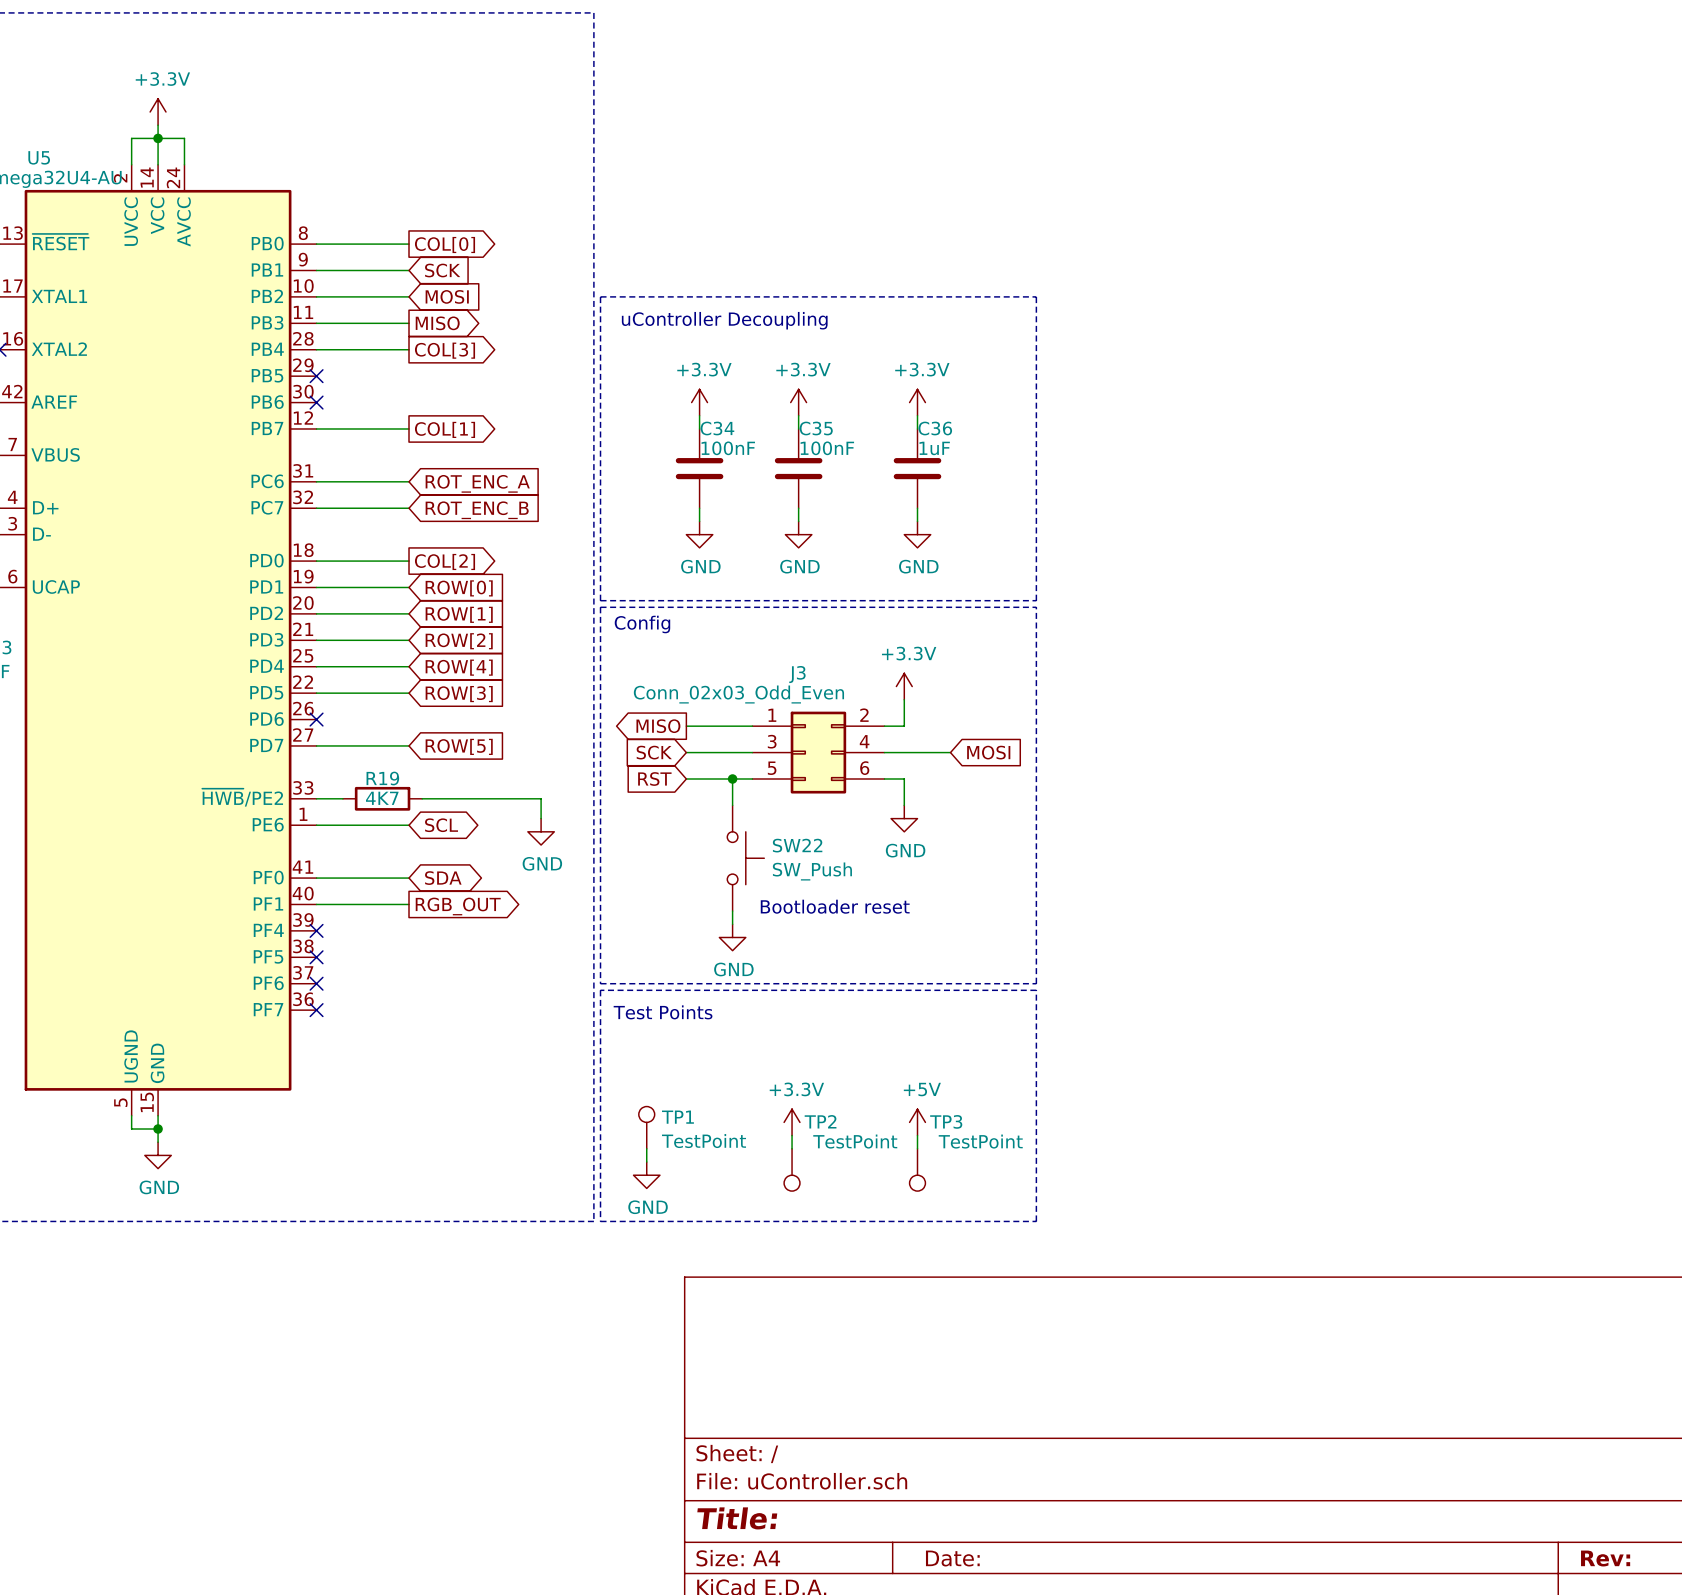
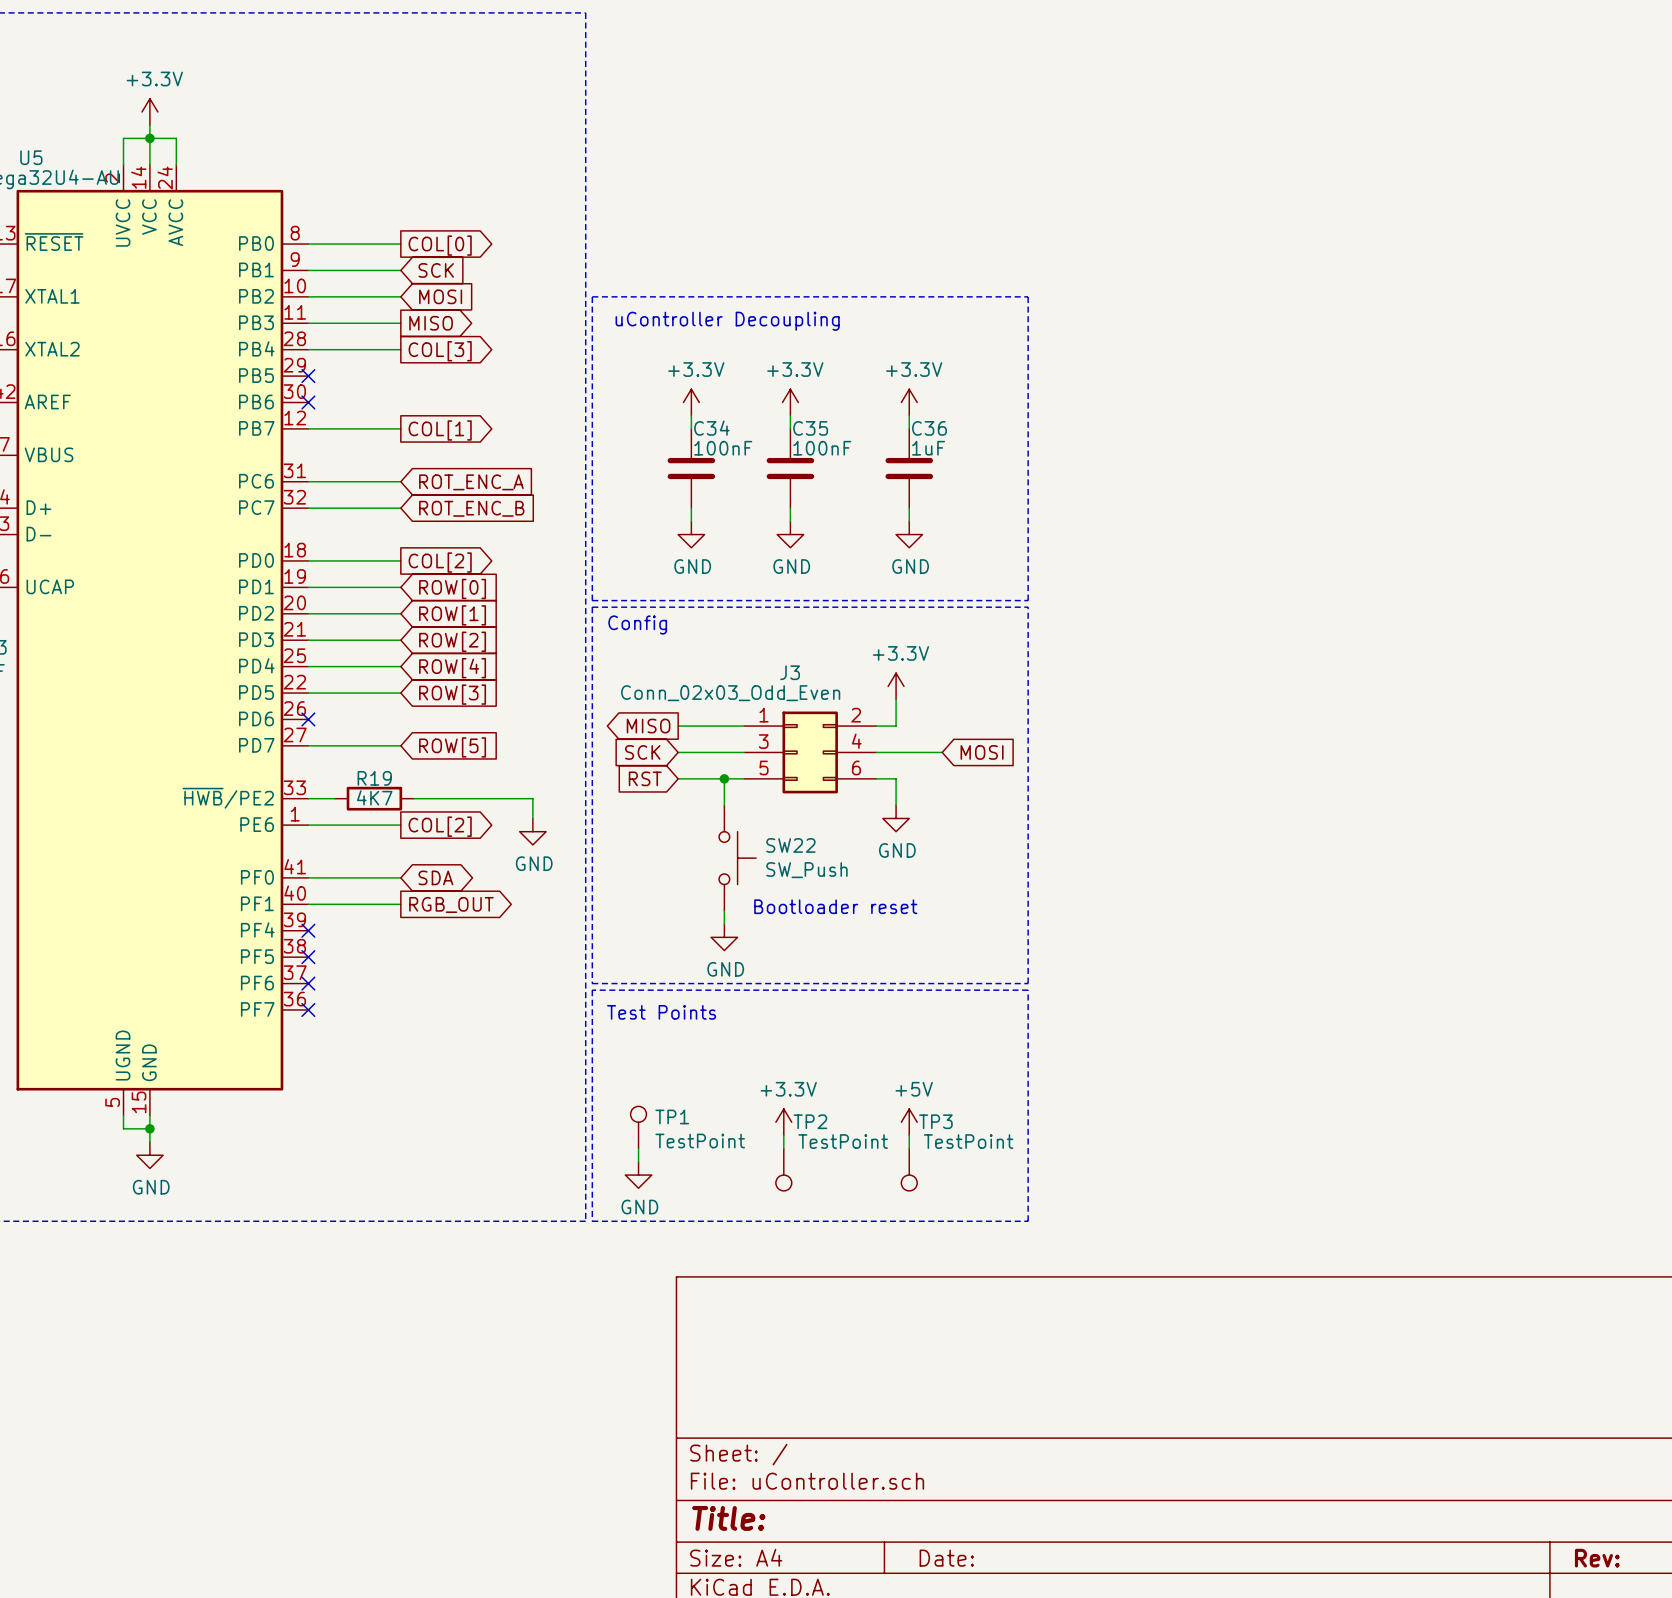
global label shape: bidirectional (441, 825) -> output (440, 826)
global label: SCL (441, 825) -> COL[2] (440, 826)

